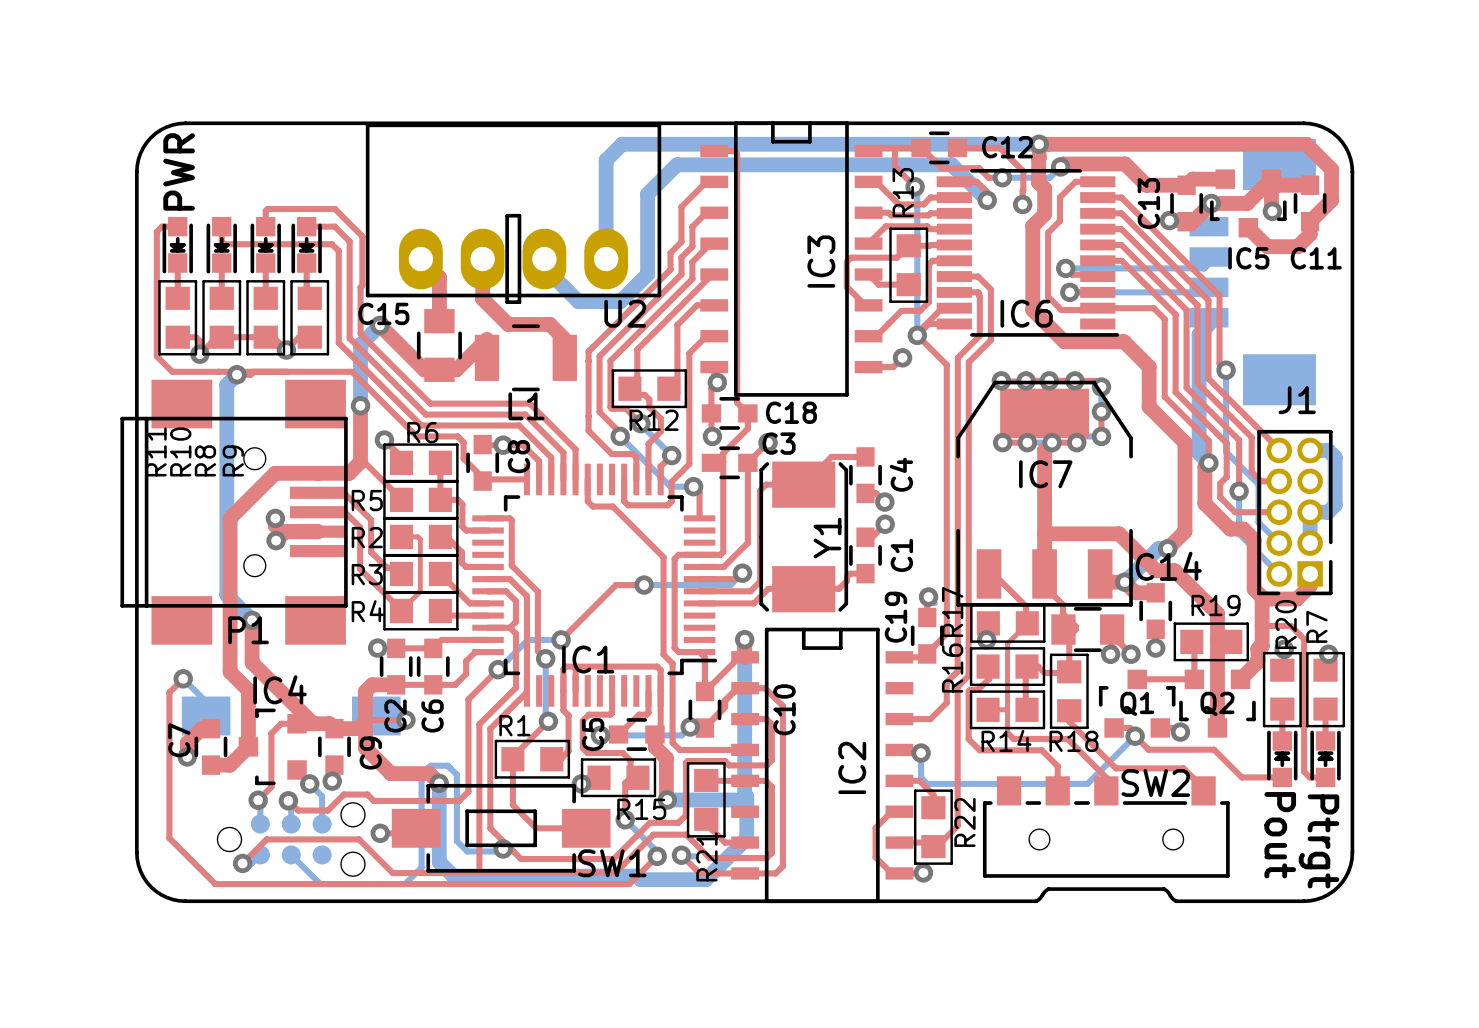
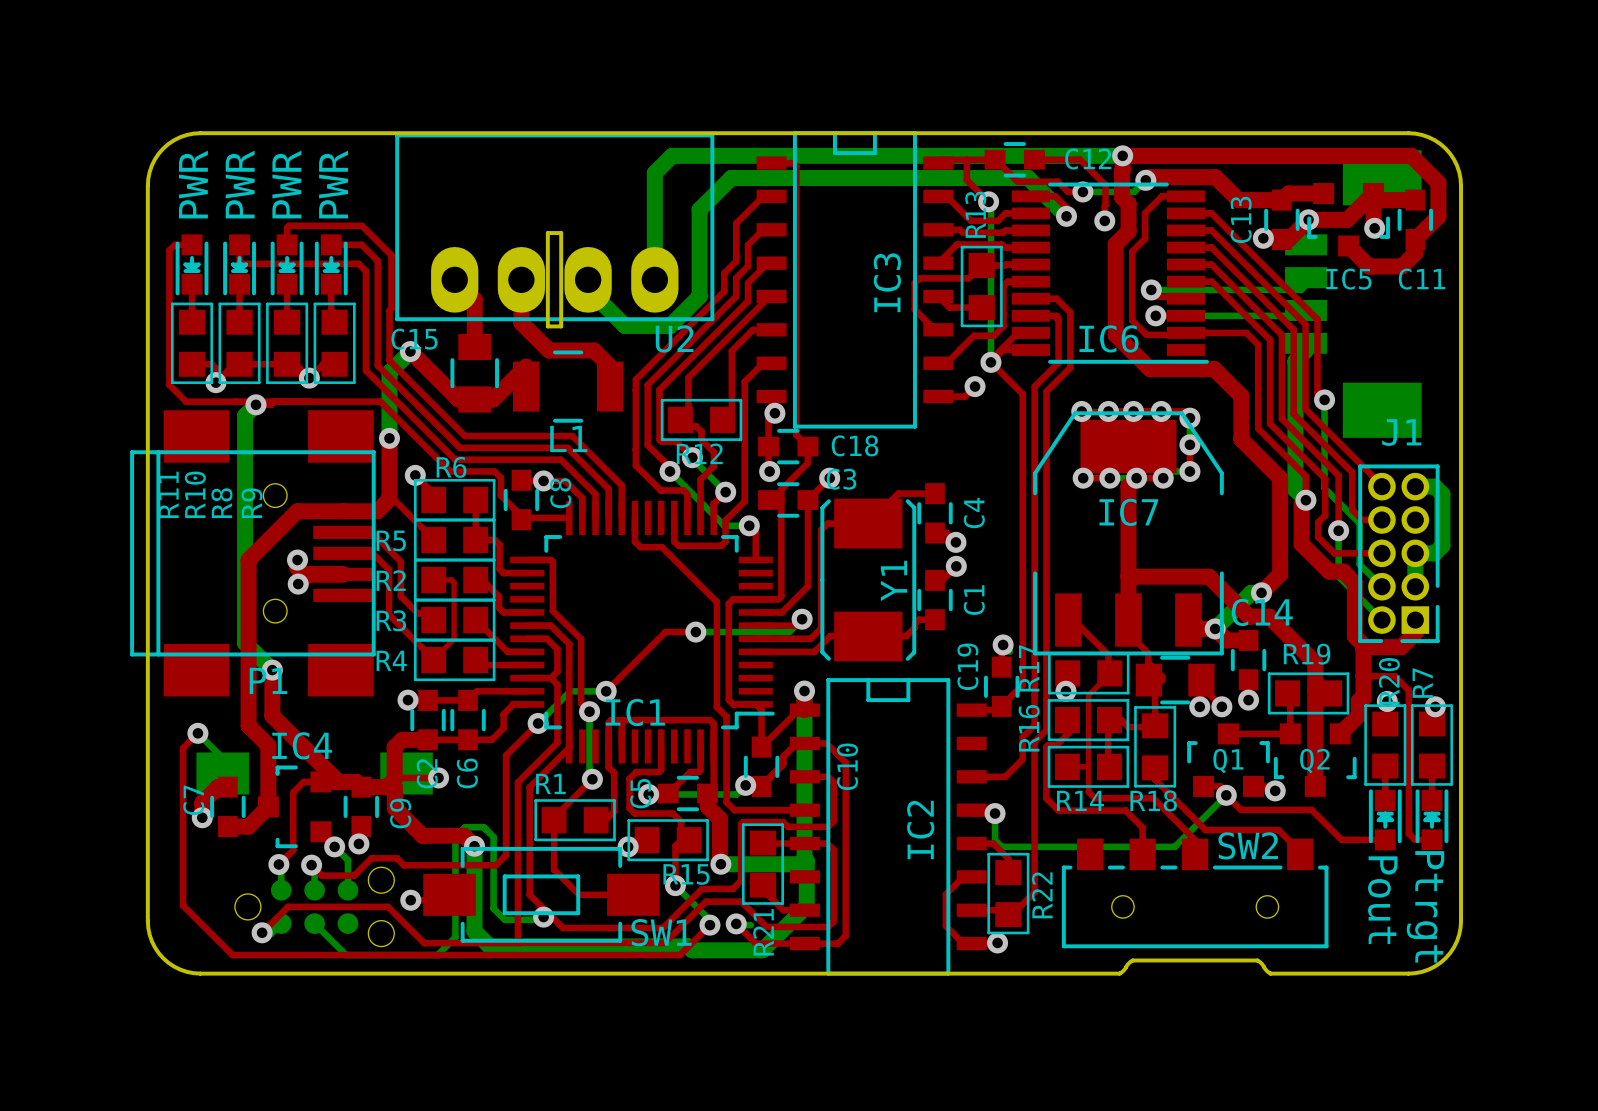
text: none -> PWR (240, 184)
text: none -> PWR (286, 184)
text: none -> PWR (333, 184)

